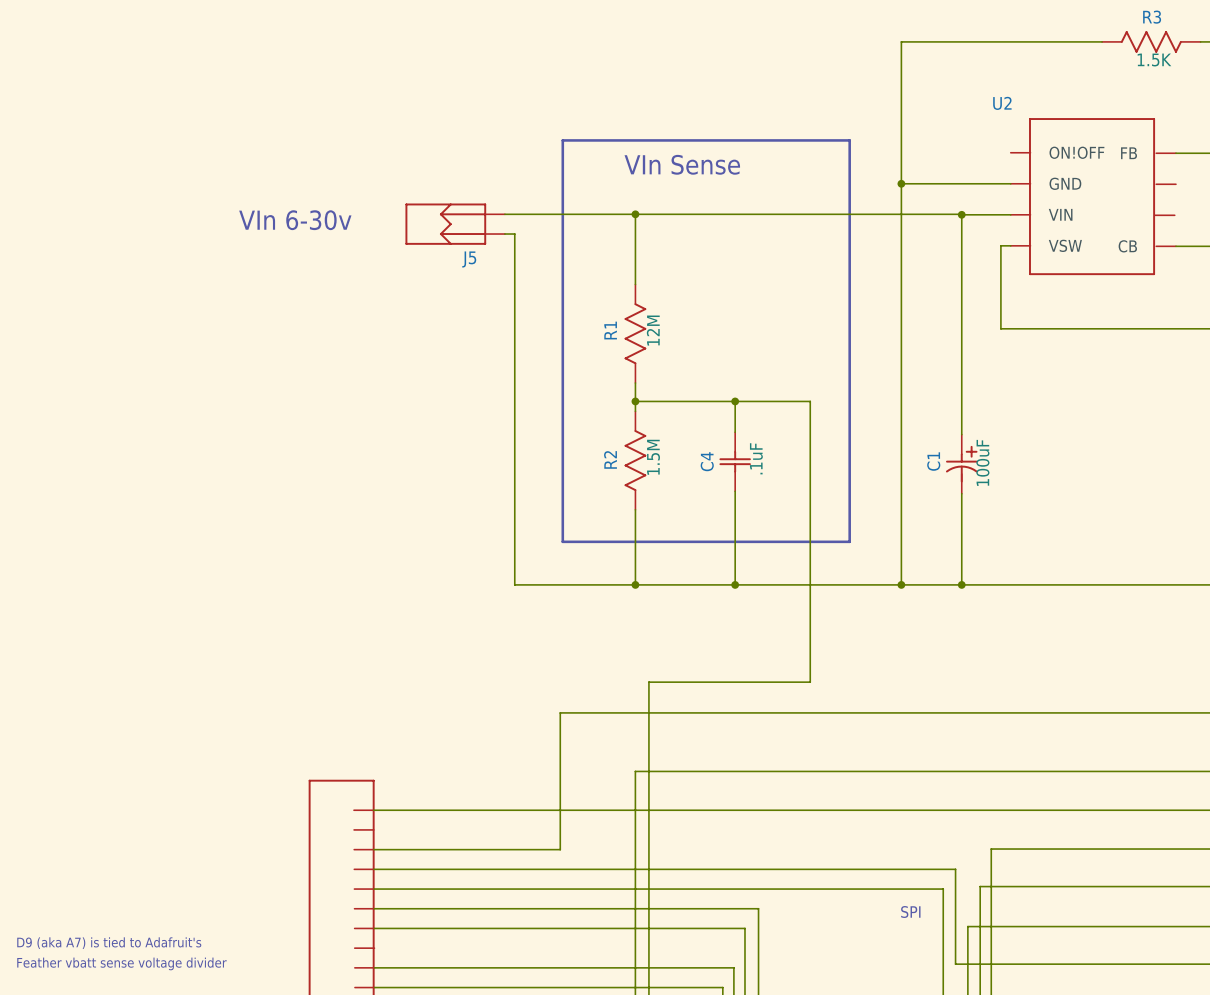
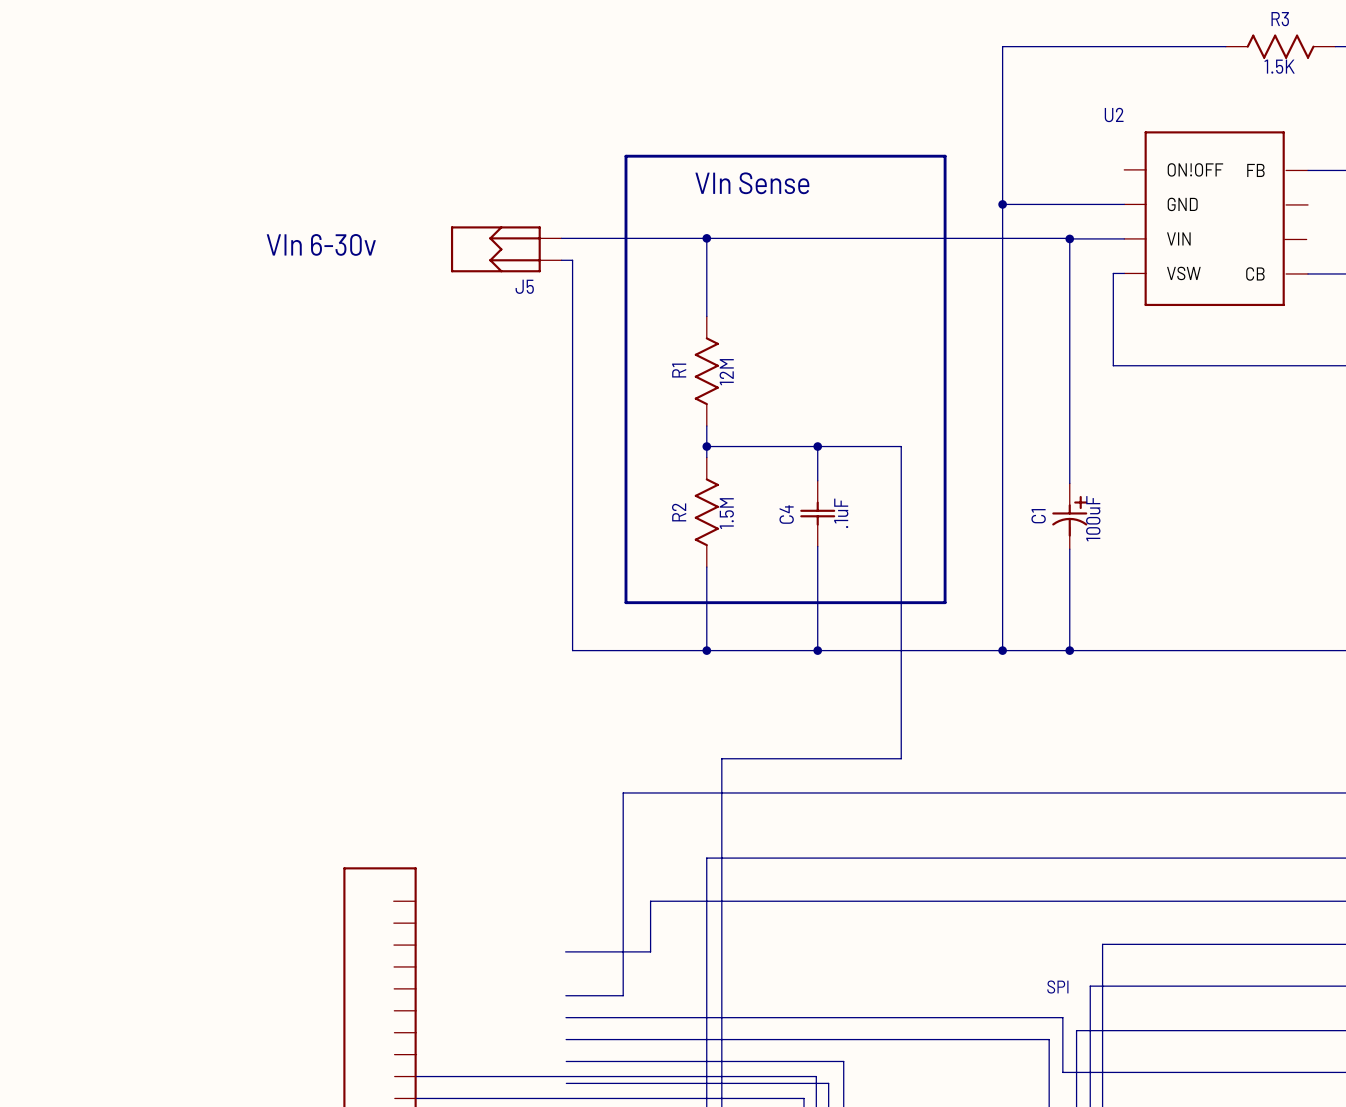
wire: (373, 810) (584, 810) -> (565, 951) (650, 951) (650, 901)
wire: (373, 849) (560, 849) -> (565, 995) (623, 995) (623, 945)
wire: (374, 869) (955, 869) (955, 914) -> (566, 1017) (1062, 1017)
wire: (374, 889) (943, 889) (943, 934) -> (566, 1039) (1049, 1039)
wire: (374, 908) (758, 908) (758, 954) -> (566, 1061) (843, 1061)
text position: SPI (910, 912) -> SPI (1057, 987)
wire: (374, 928) (744, 928) (744, 974) -> (566, 1083) (828, 1083)
text: D9 (aka A7) is tied to Adafruit's (109, 943) -> none
text: Feather vbatt sense voltage divider (121, 963) -> none

